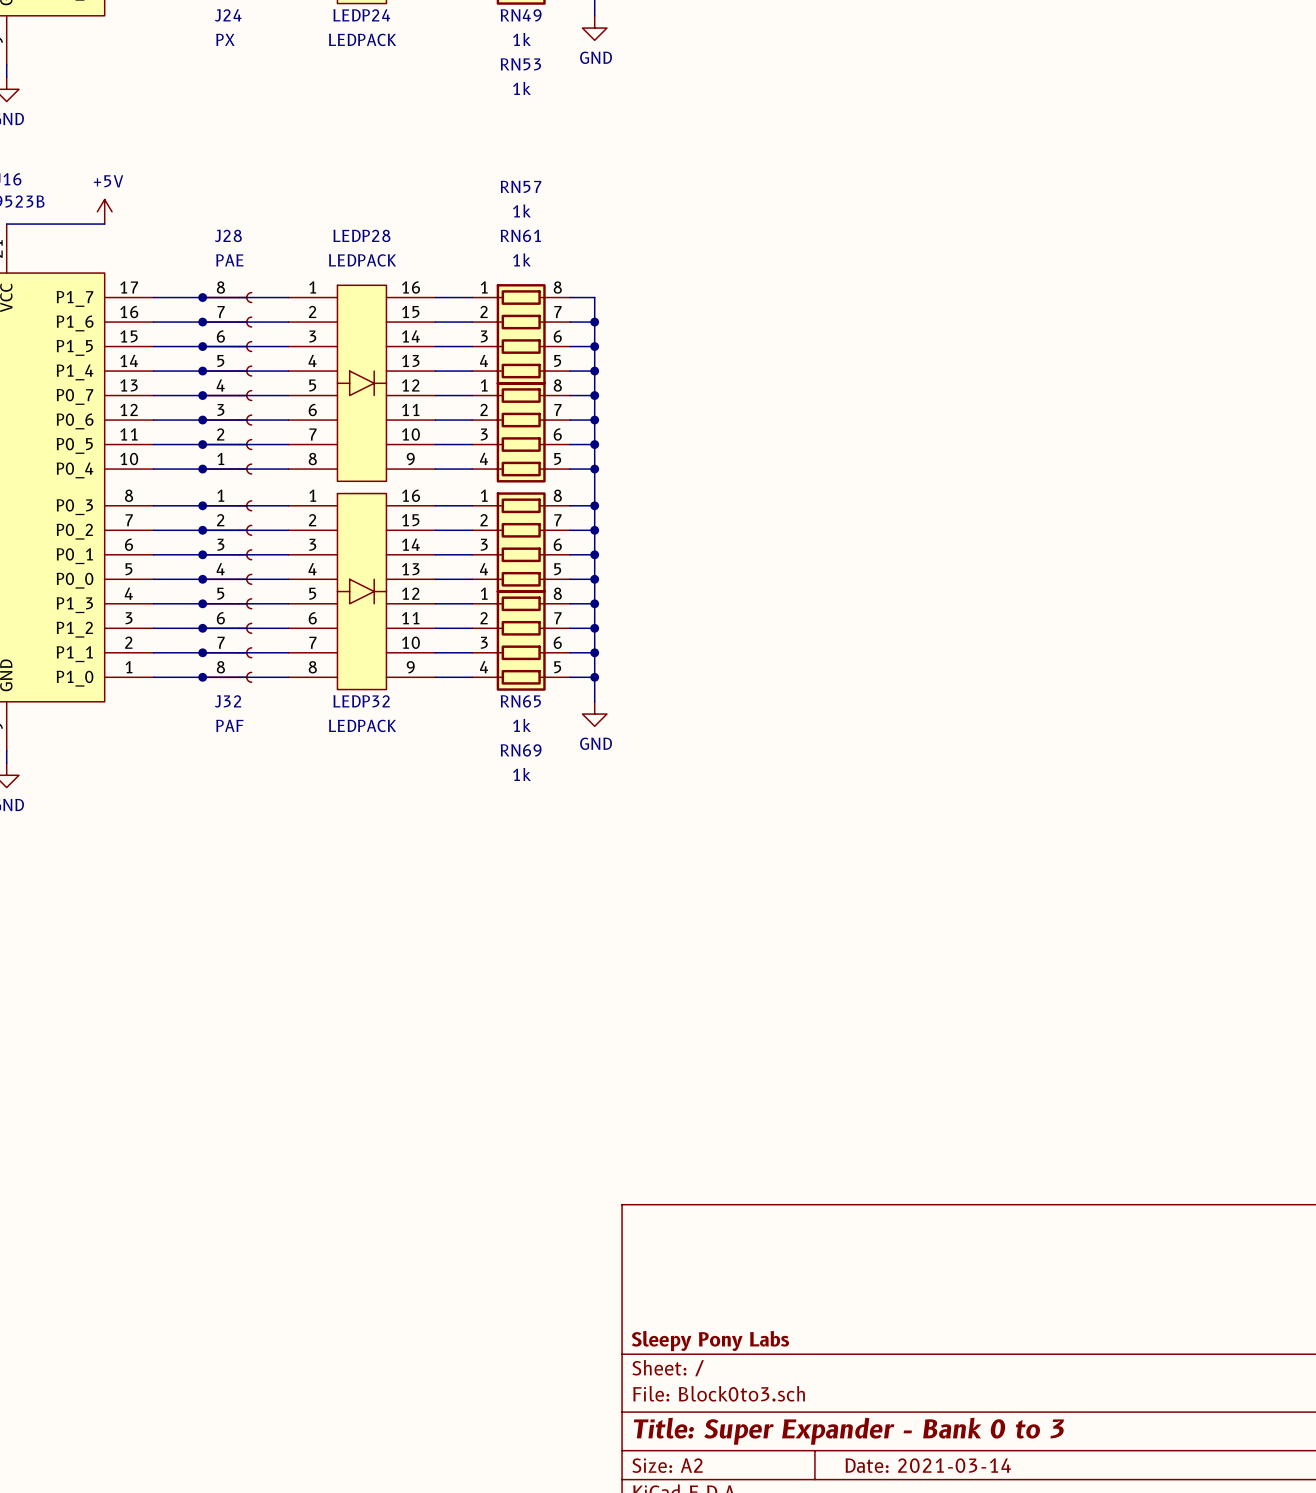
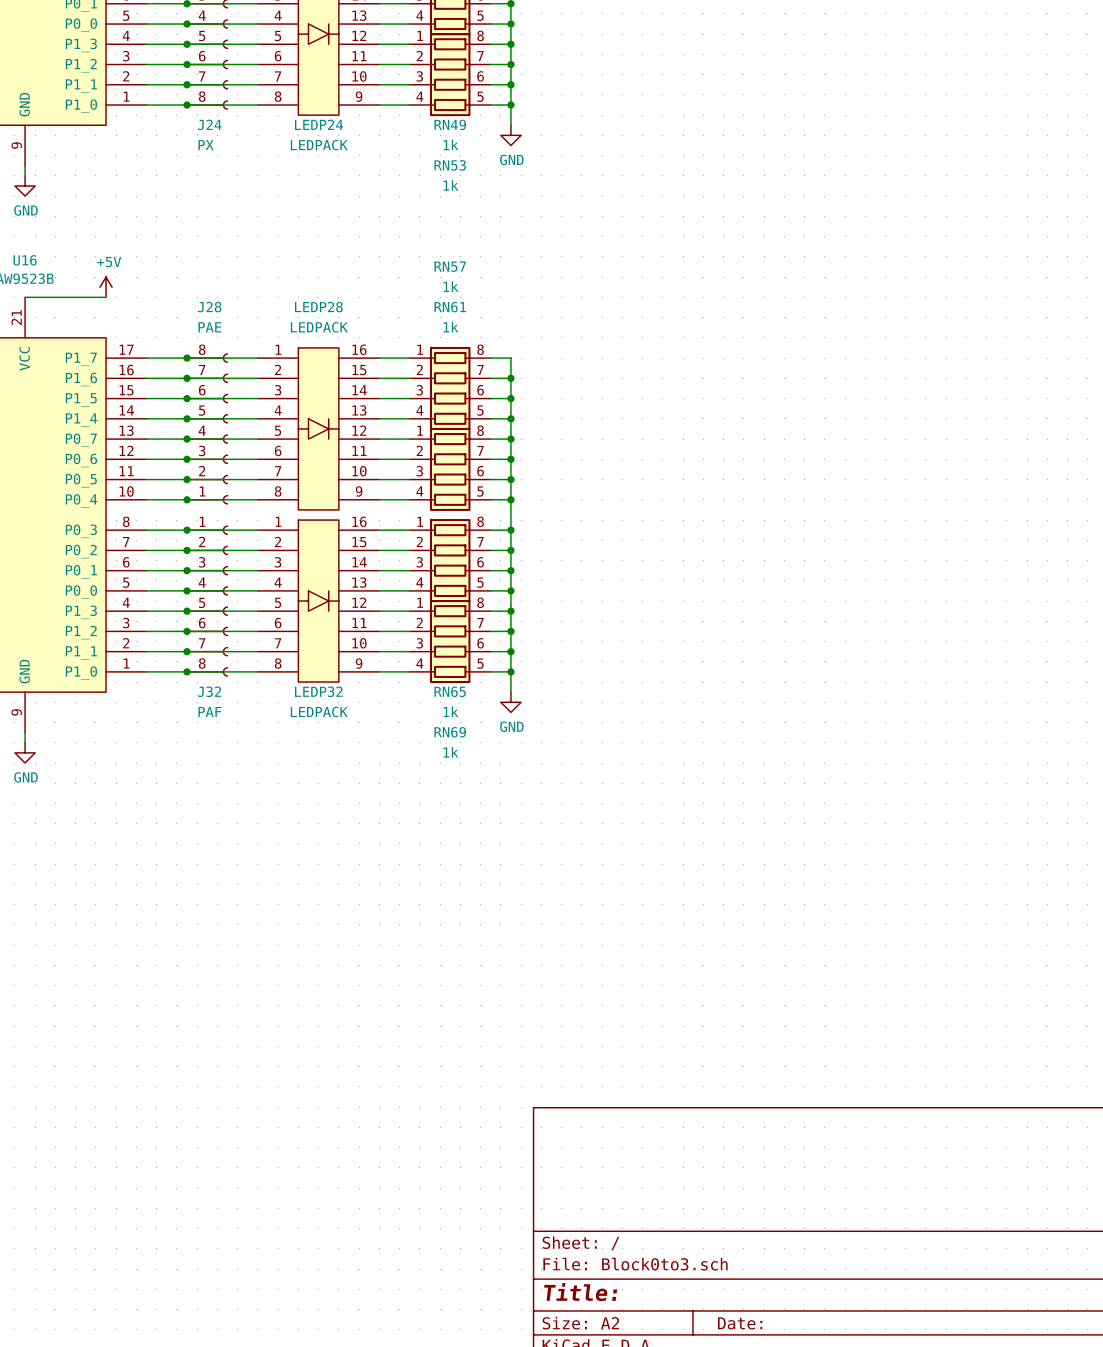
title block: Sleepy Pony Labs (710, 1341) -> none
title block: Title: Super Expander - Bank 0 to 3 (848, 1431) -> Title: (580, 1292)
title block: Date: 2021-03-14 (928, 1465) -> Date: (740, 1323)

